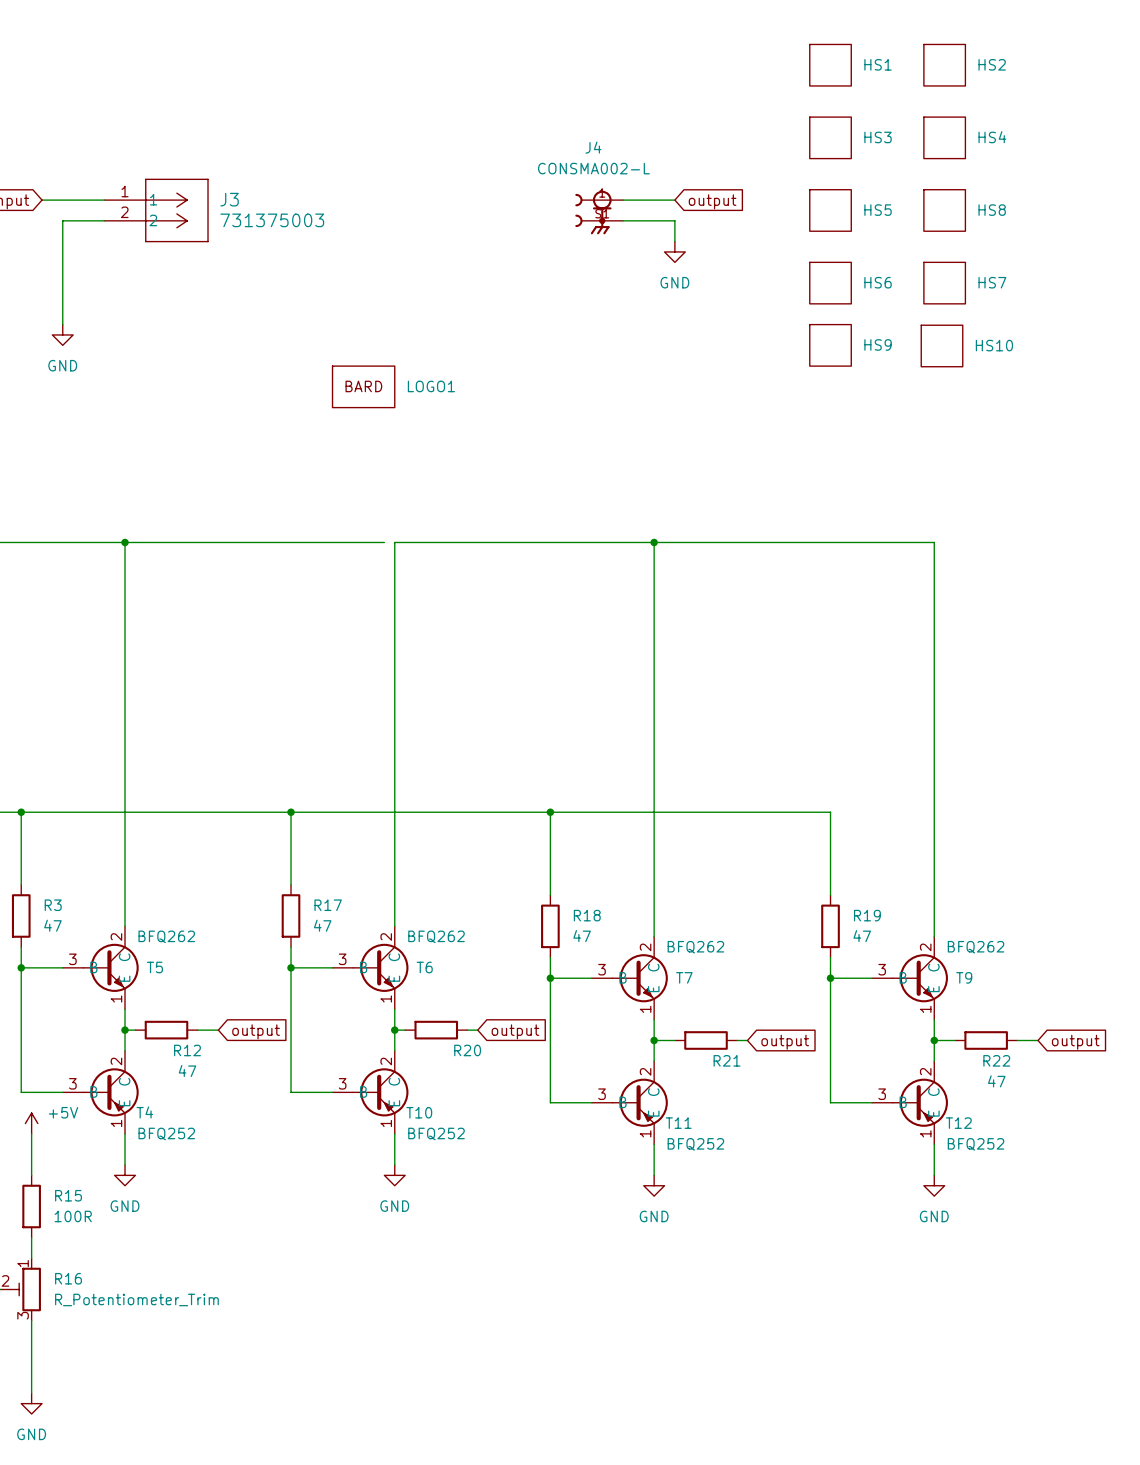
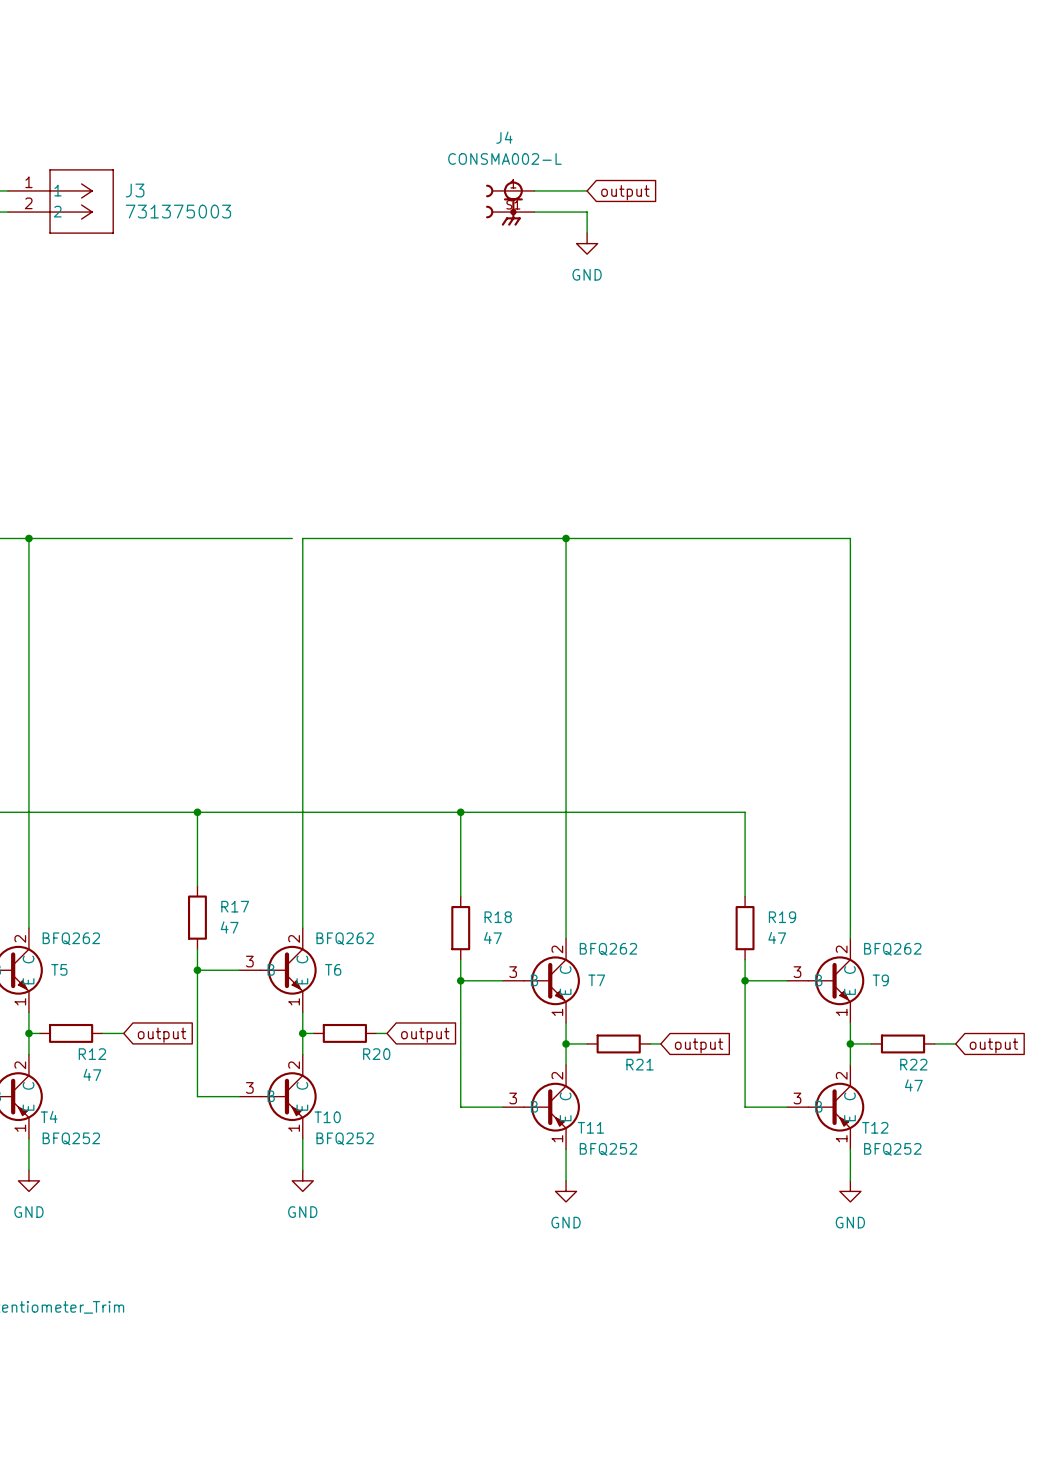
HS1: (830, 65) -> none
HS2: (944, 65) -> none
HS3: (830, 137) -> none
HS4: (944, 137) -> none
HS5: (830, 210) -> none
HS8: (944, 210) -> none
HS6: (830, 283) -> none
HS7: (944, 283) -> none
HS9: (830, 345) -> none
HS10: (941, 345) -> none
LOGO1: (363, 386) -> none

